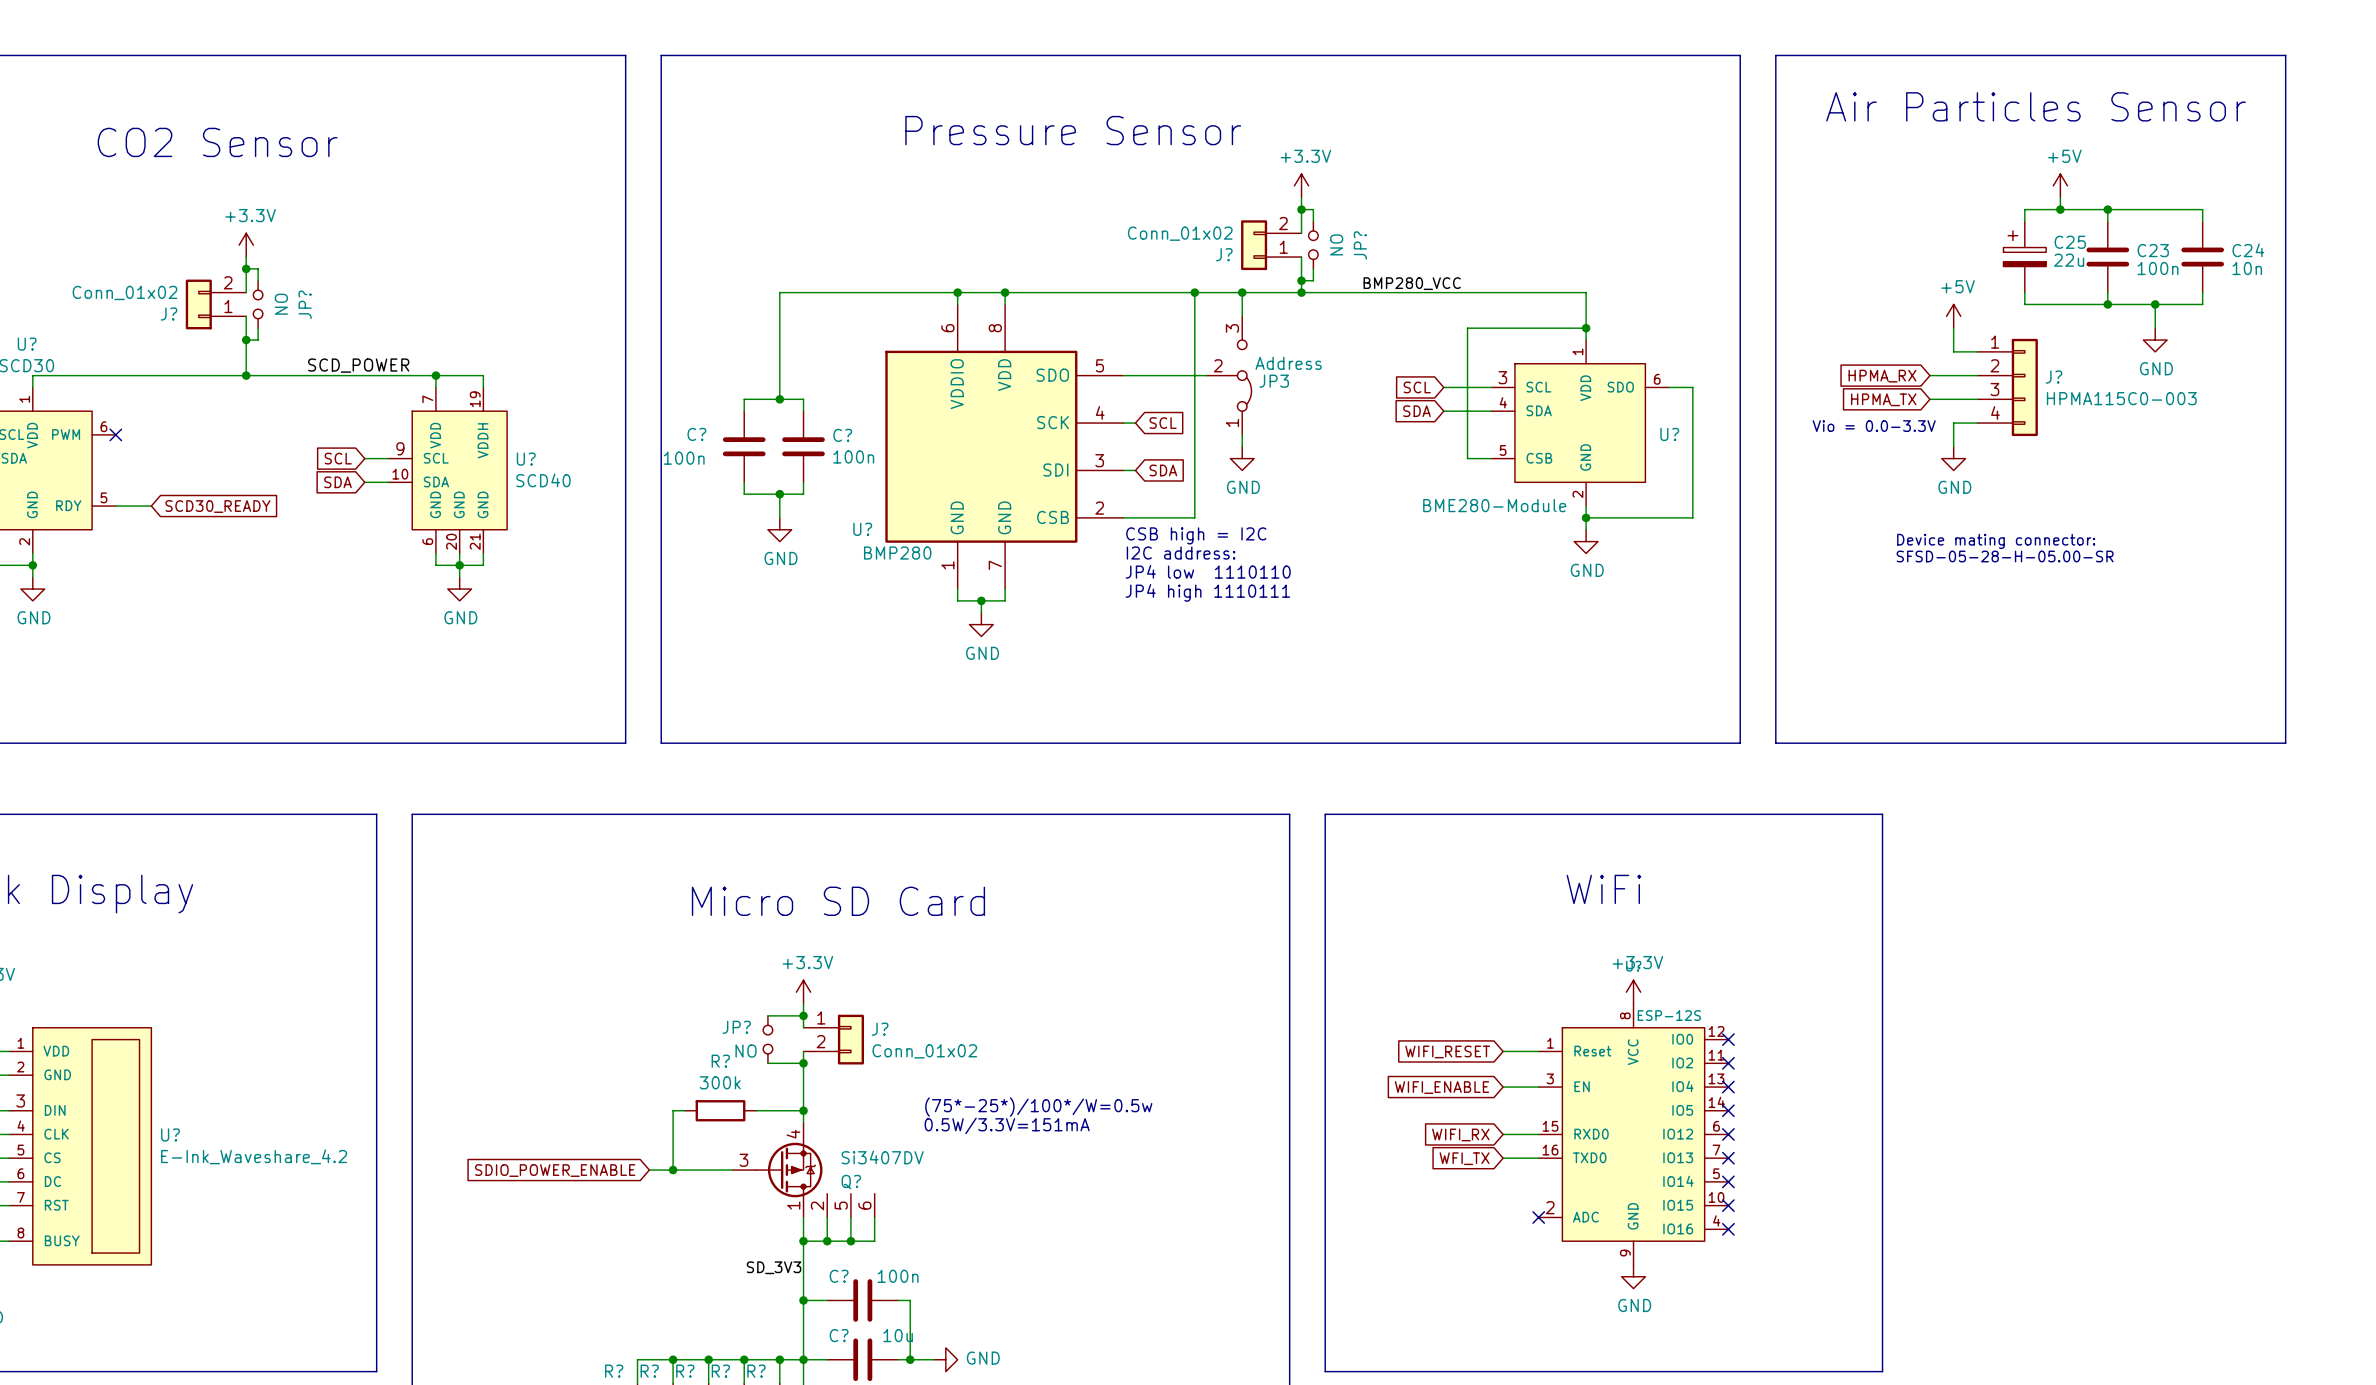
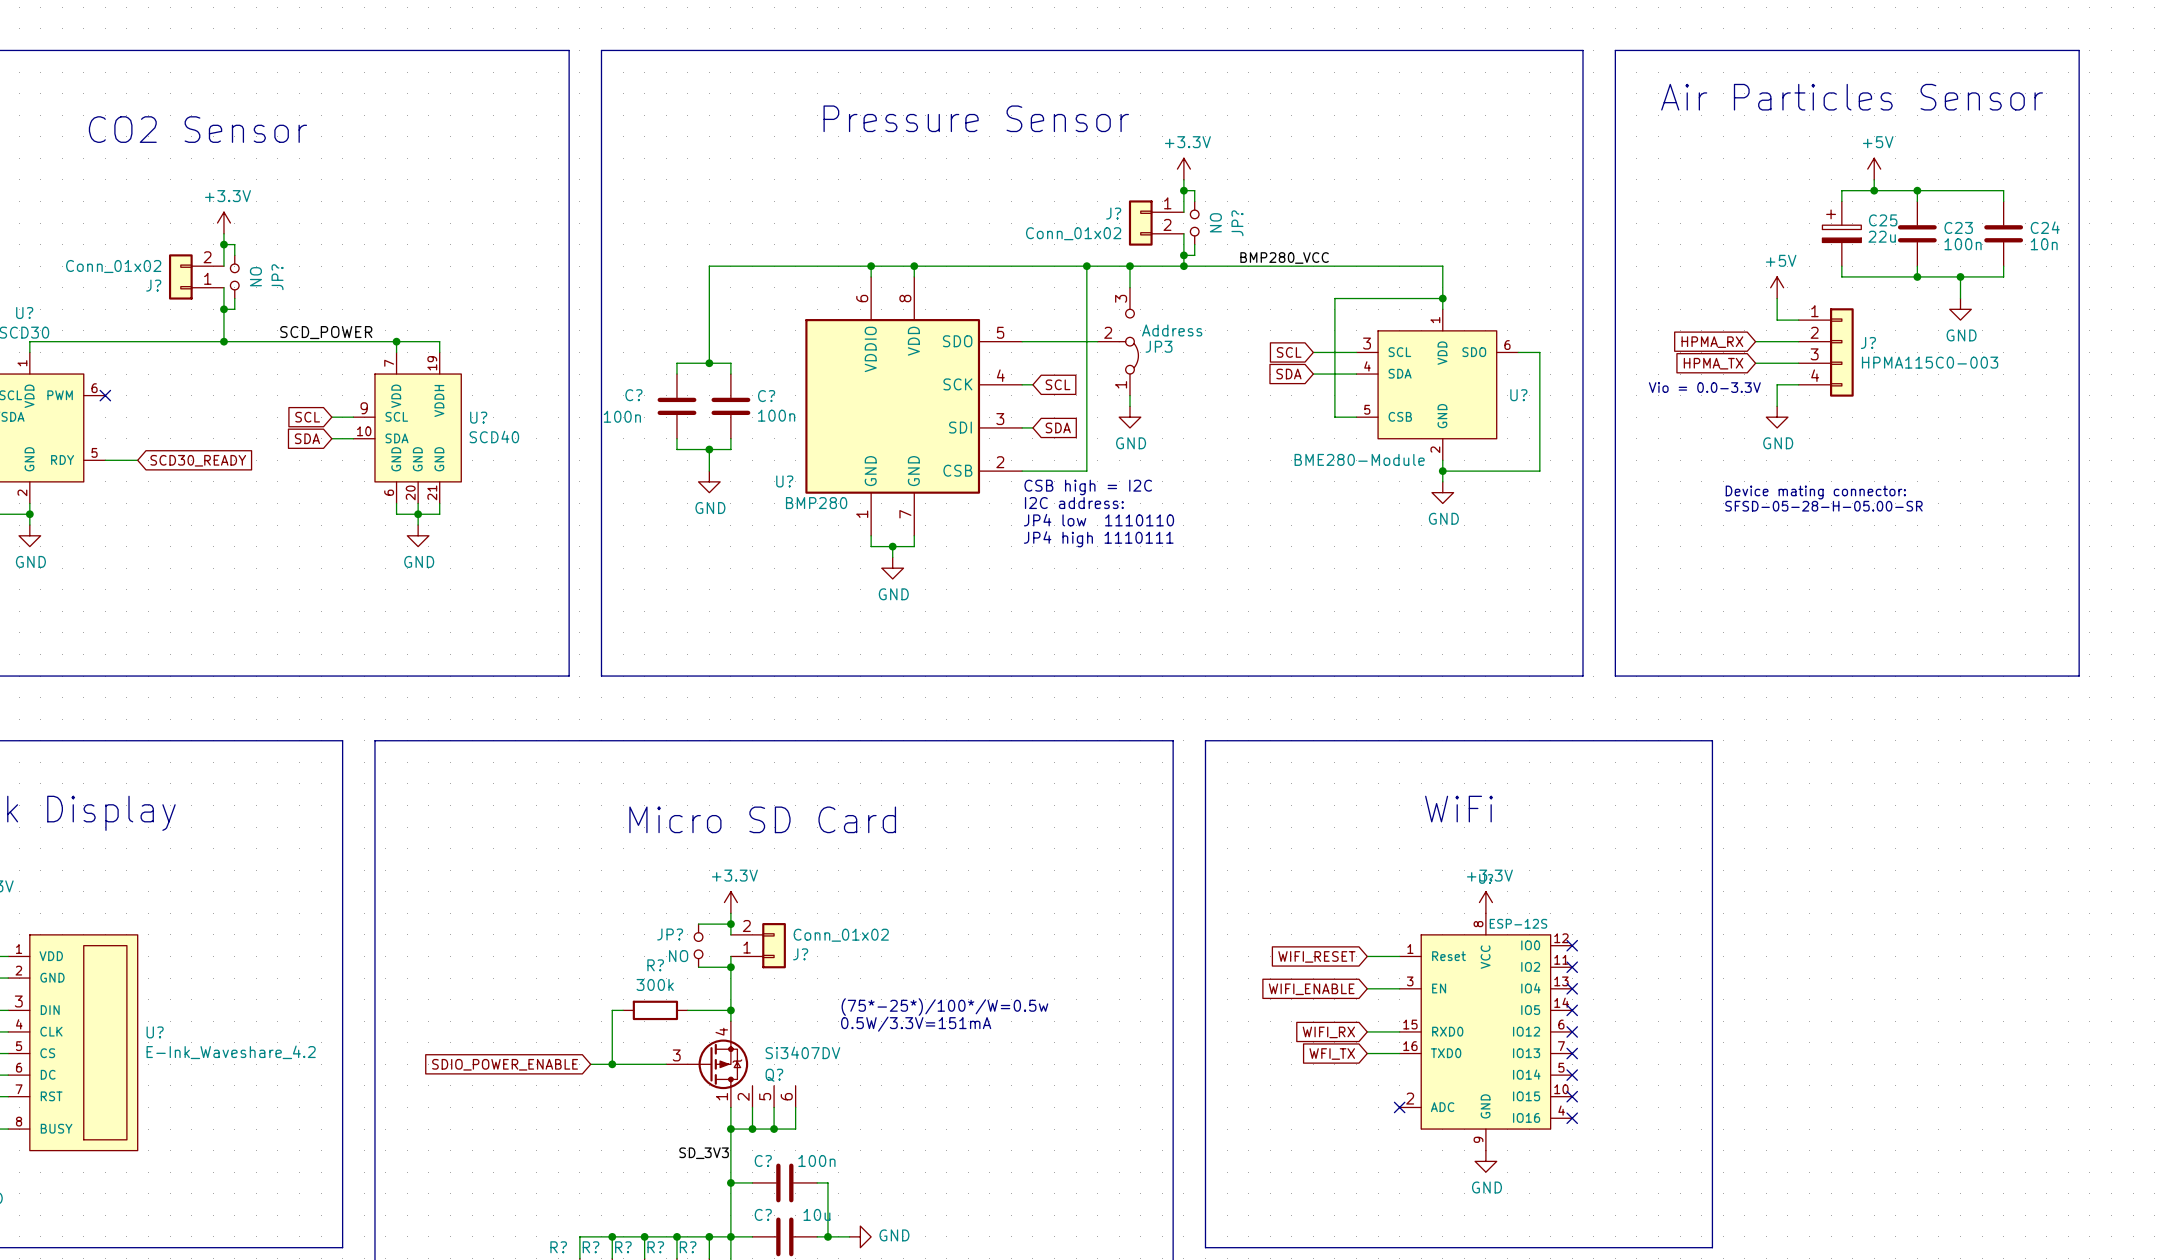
J? flip: as is (1254, 245) -> up-down (1140, 223)
J? flip: as is (850, 1039) -> up-down (774, 945)

